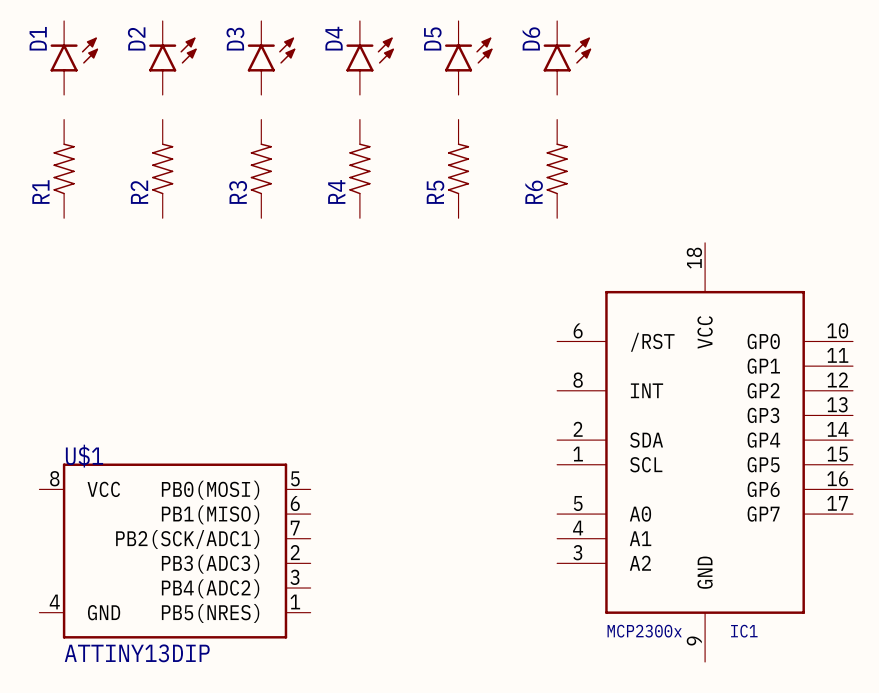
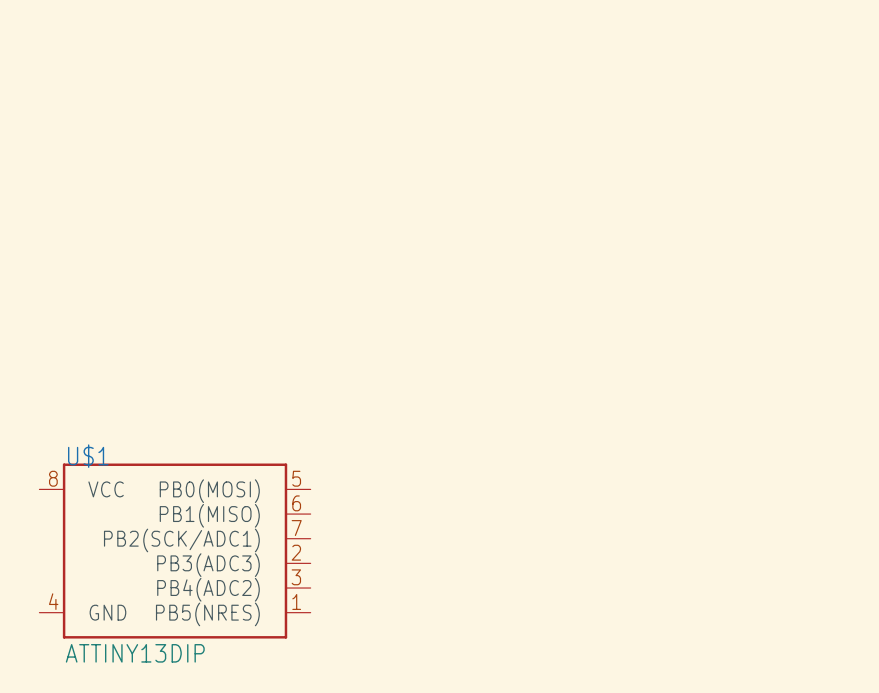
D1: (74, 57) -> none
D2: (172, 57) -> none
D3: (271, 57) -> none
D4: (370, 57) -> none
D5: (468, 57) -> none
D6: (567, 57) -> none
R1: (64, 168) -> none
R2: (162, 168) -> none
R3: (261, 168) -> none
R4: (359, 168) -> none
R5: (458, 168) -> none
R6: (557, 168) -> none
IC1: (705, 452) -> none

